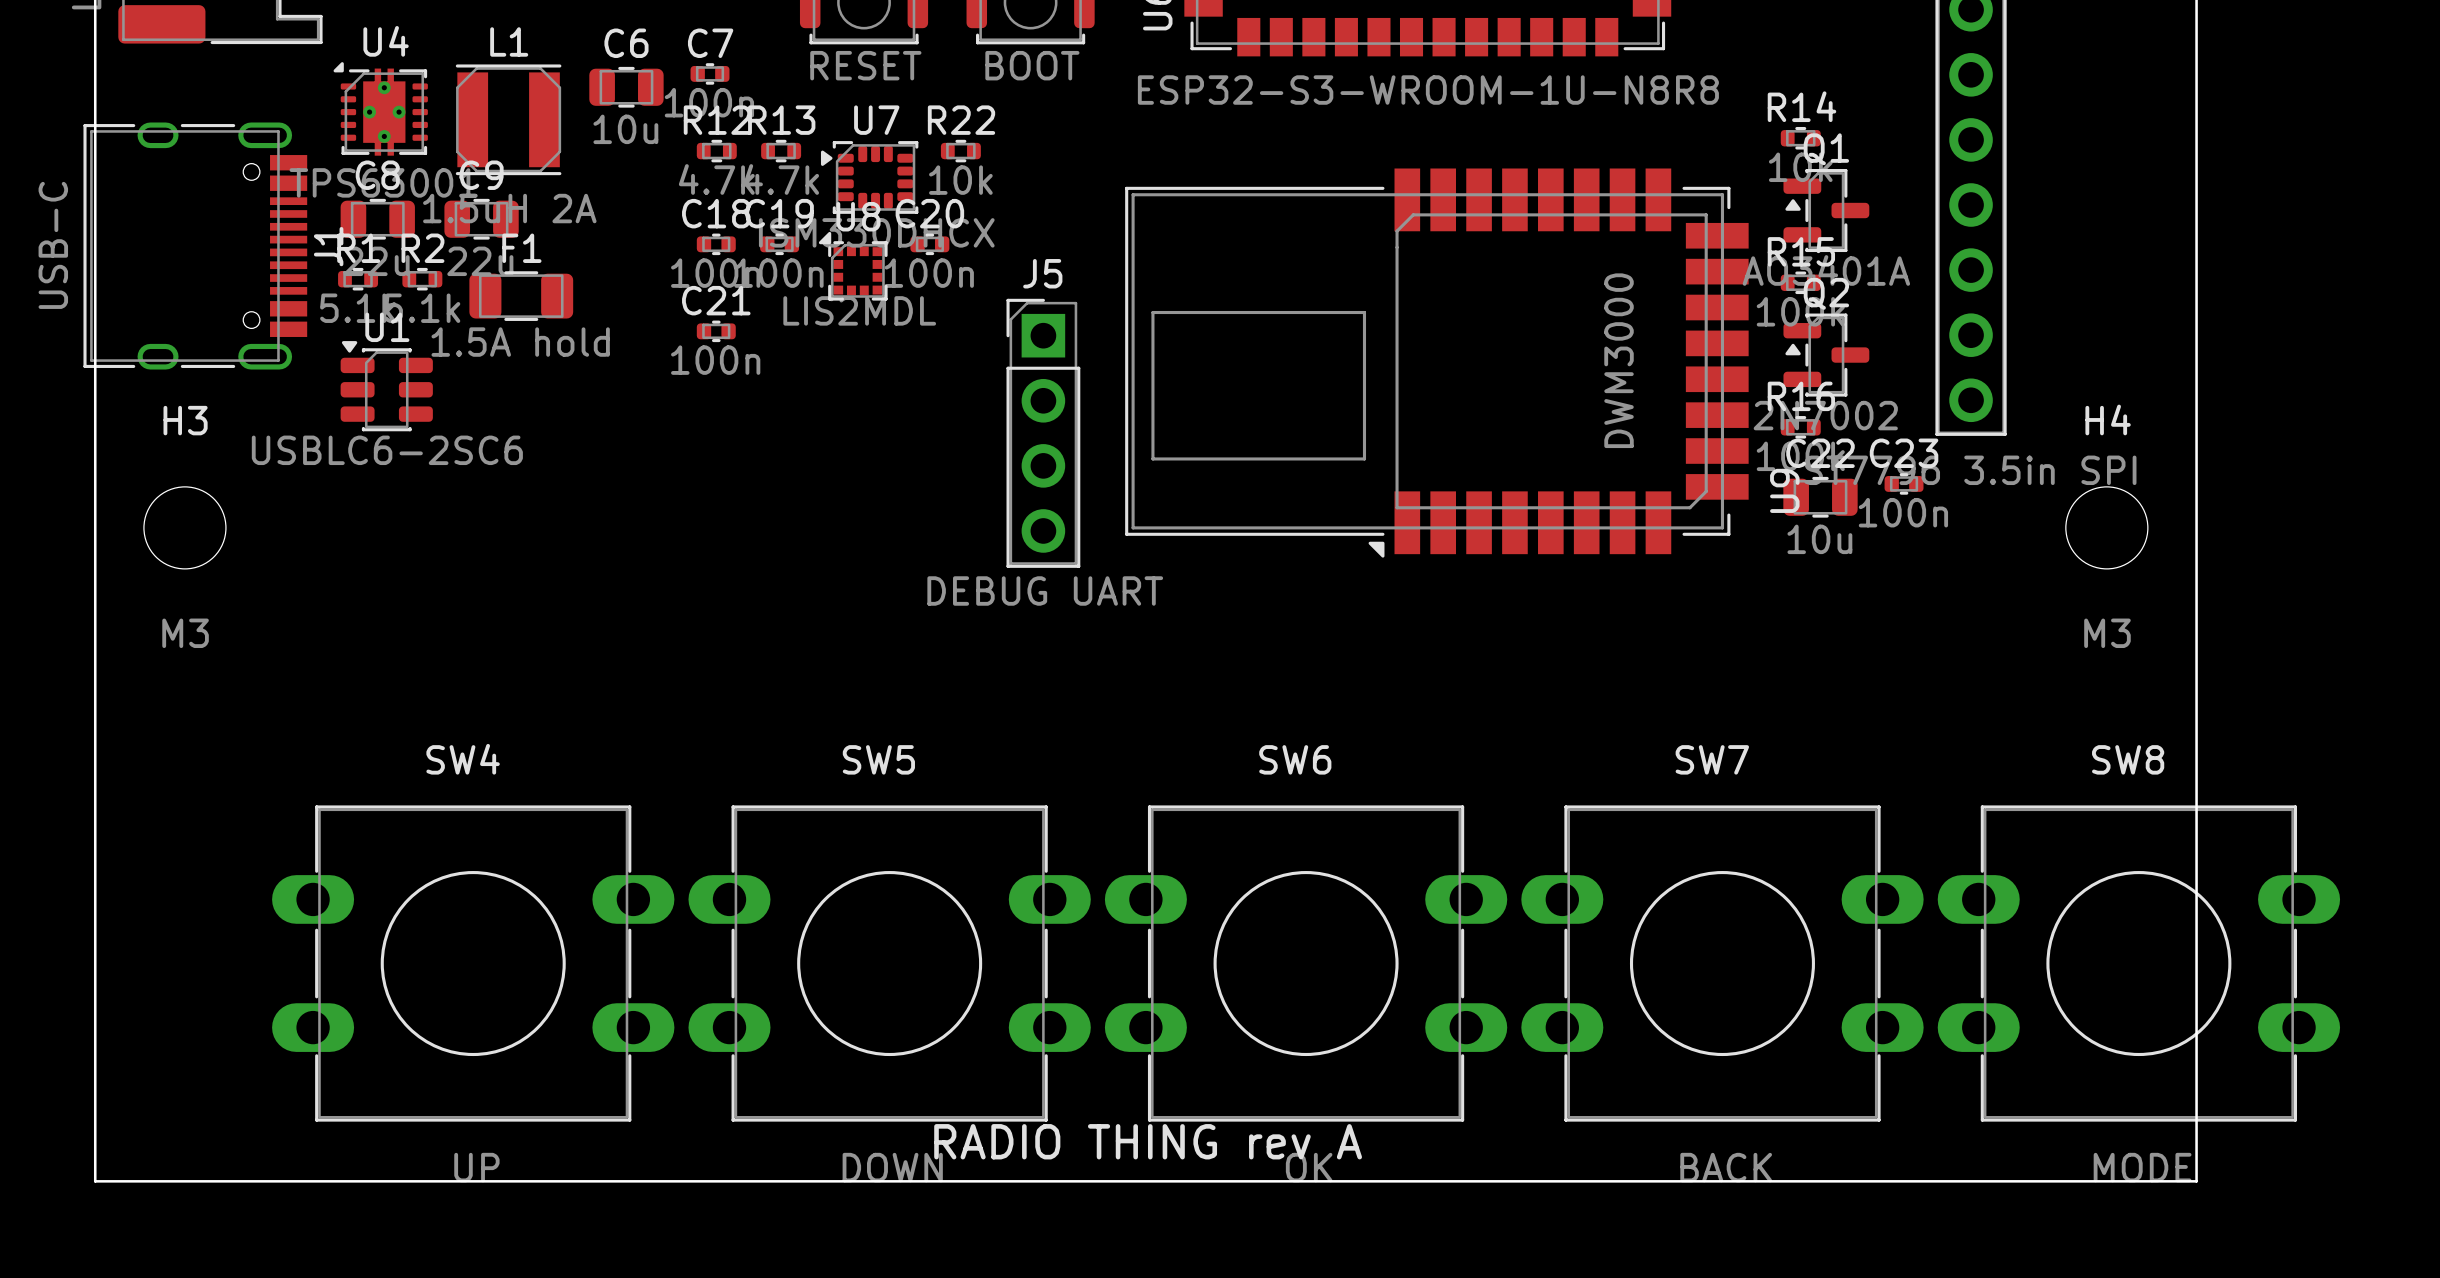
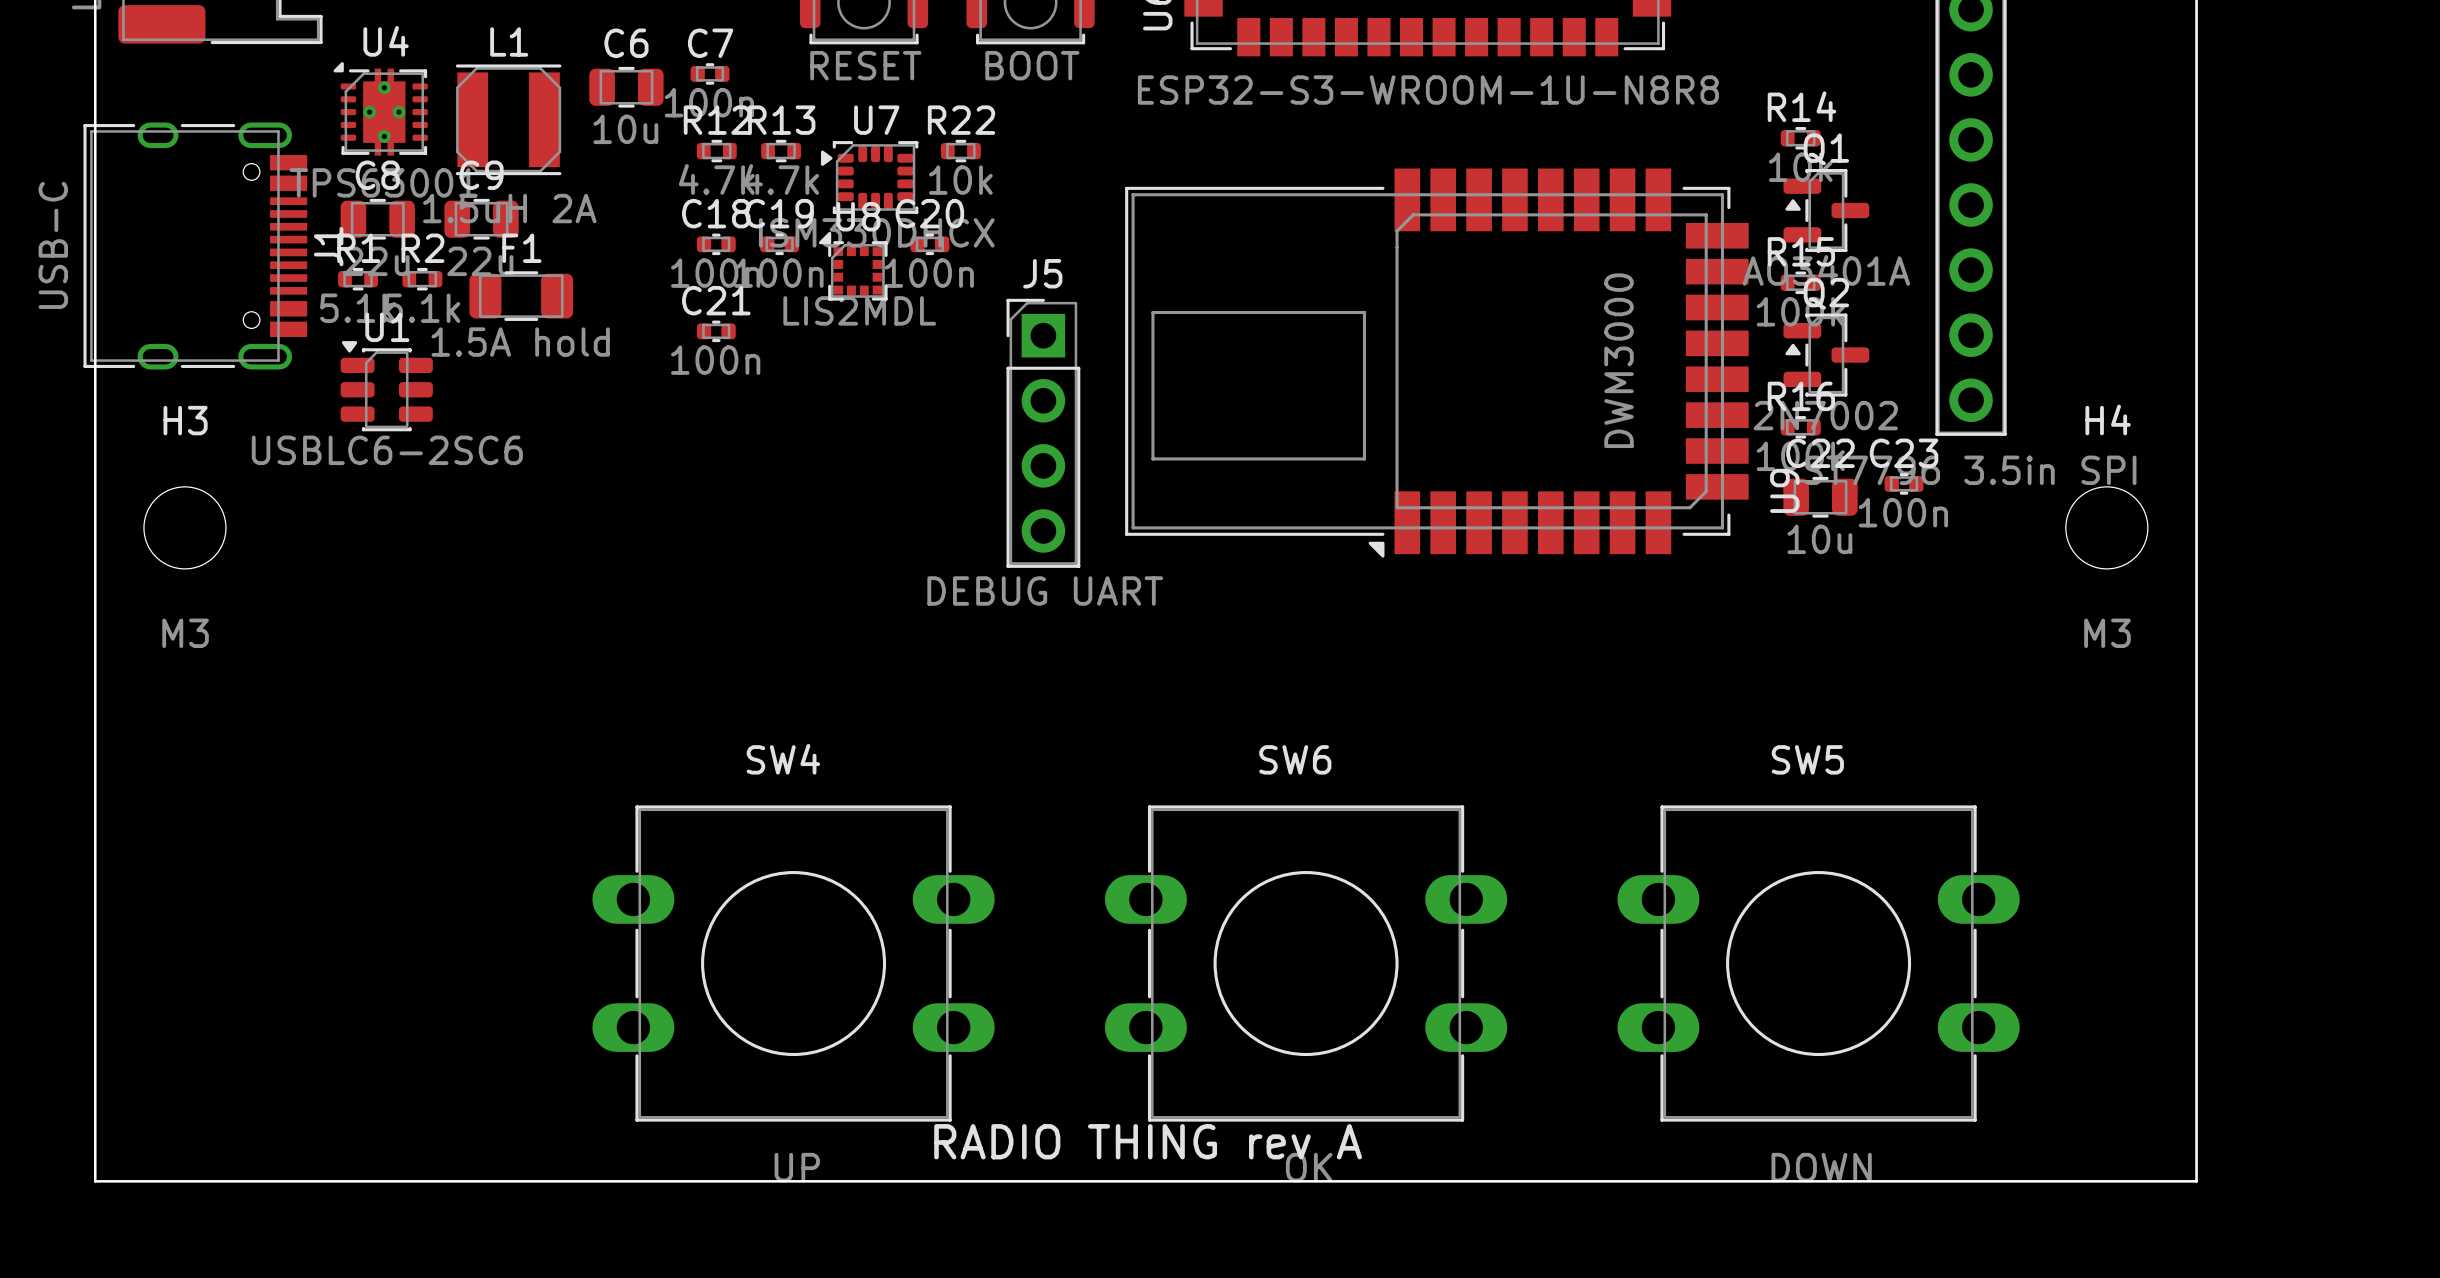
SW4 position: (473, 963) -> (793, 963)
SW5 position: (889, 963) -> (1818, 963)
SW7: BACK (1722, 963) -> none
SW8: MODE (2138, 963) -> none

